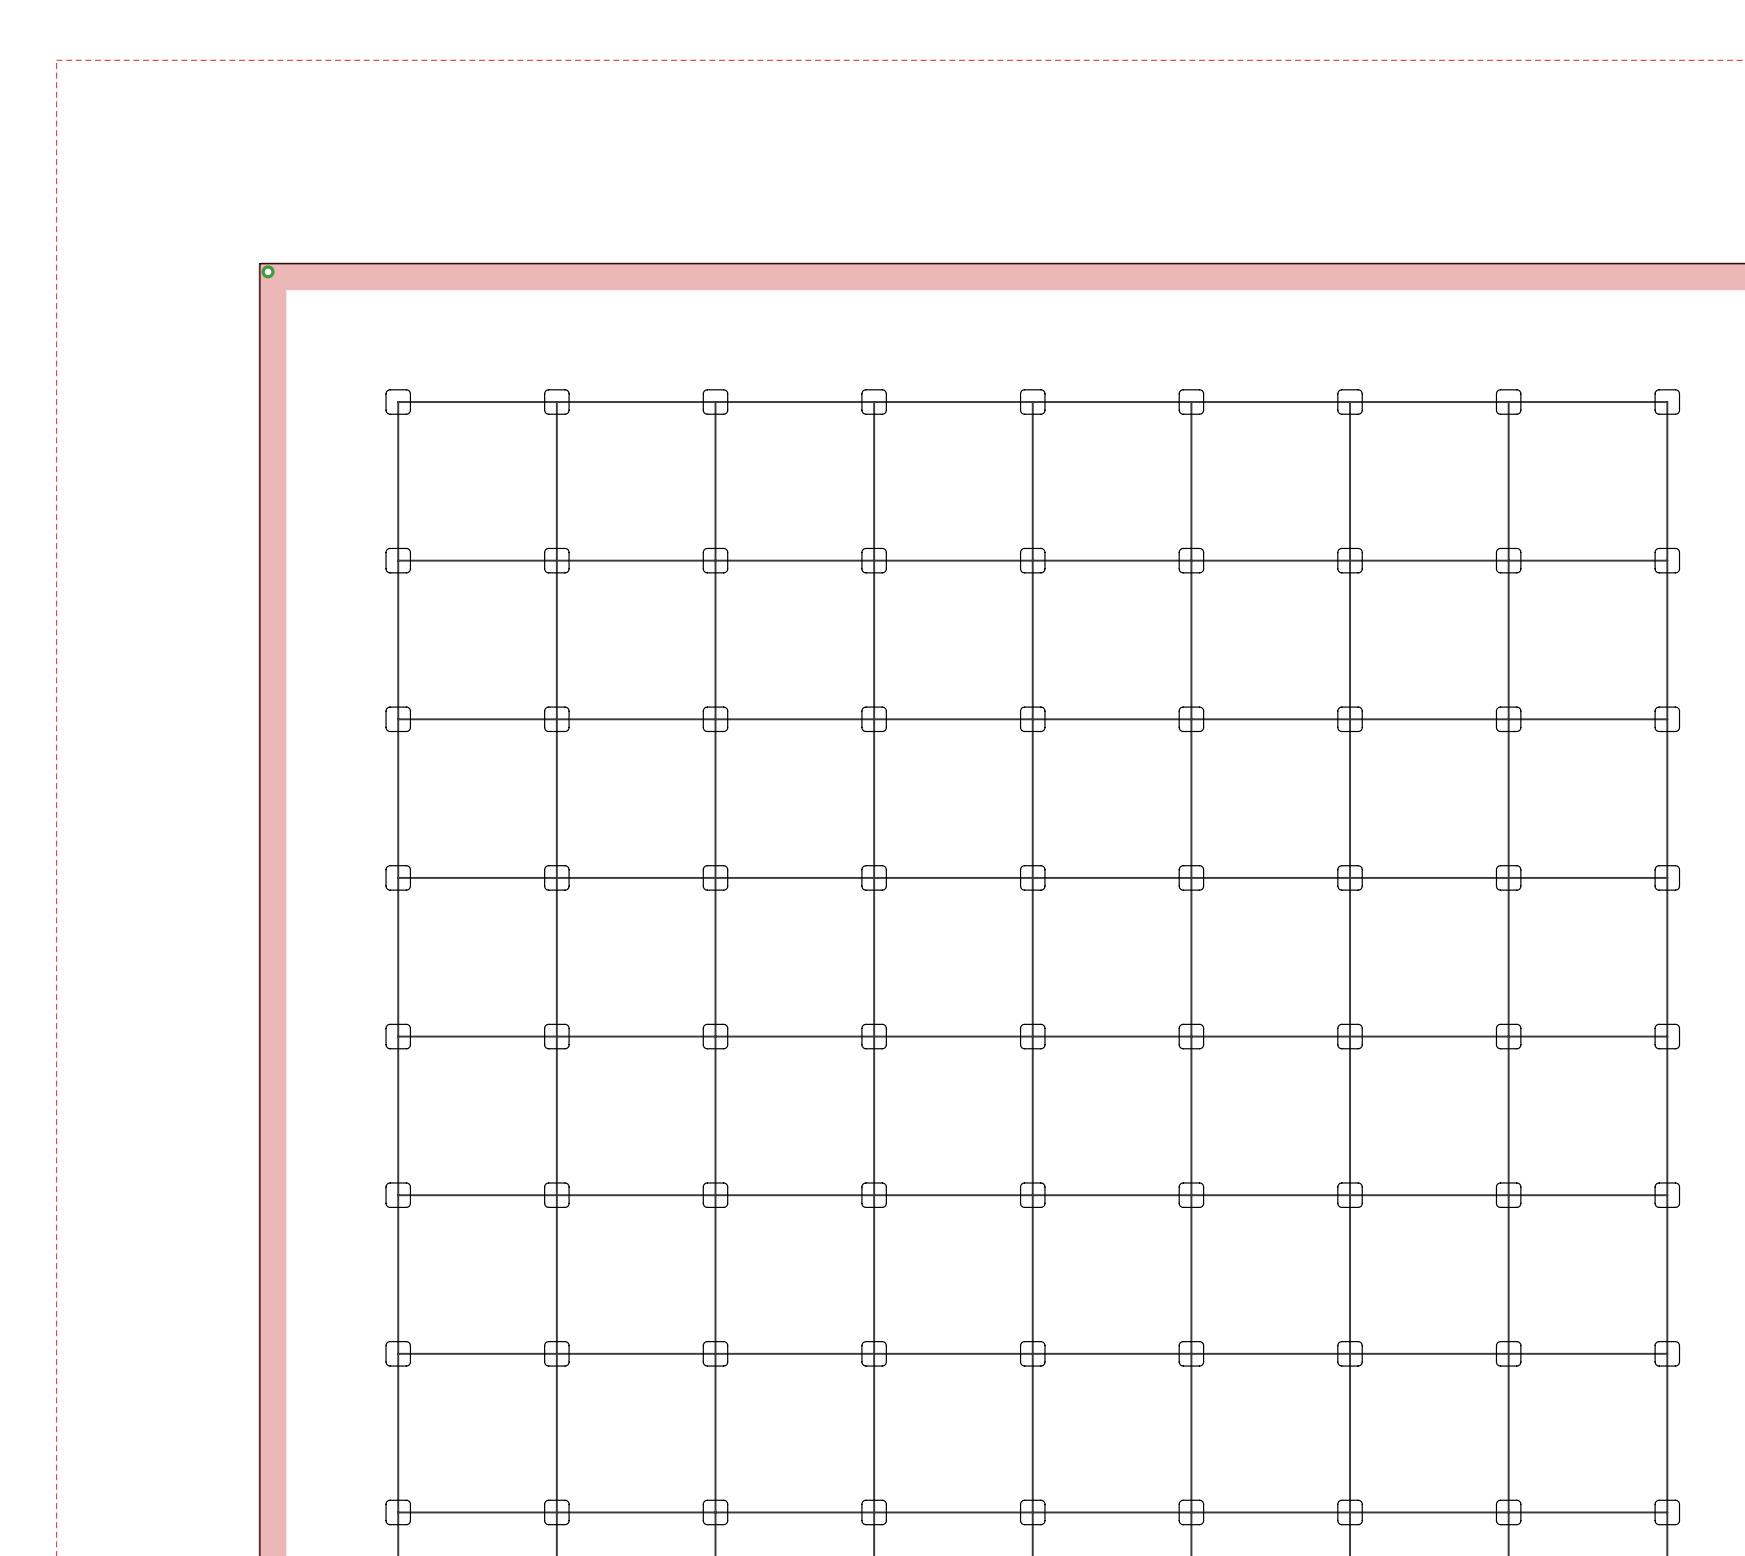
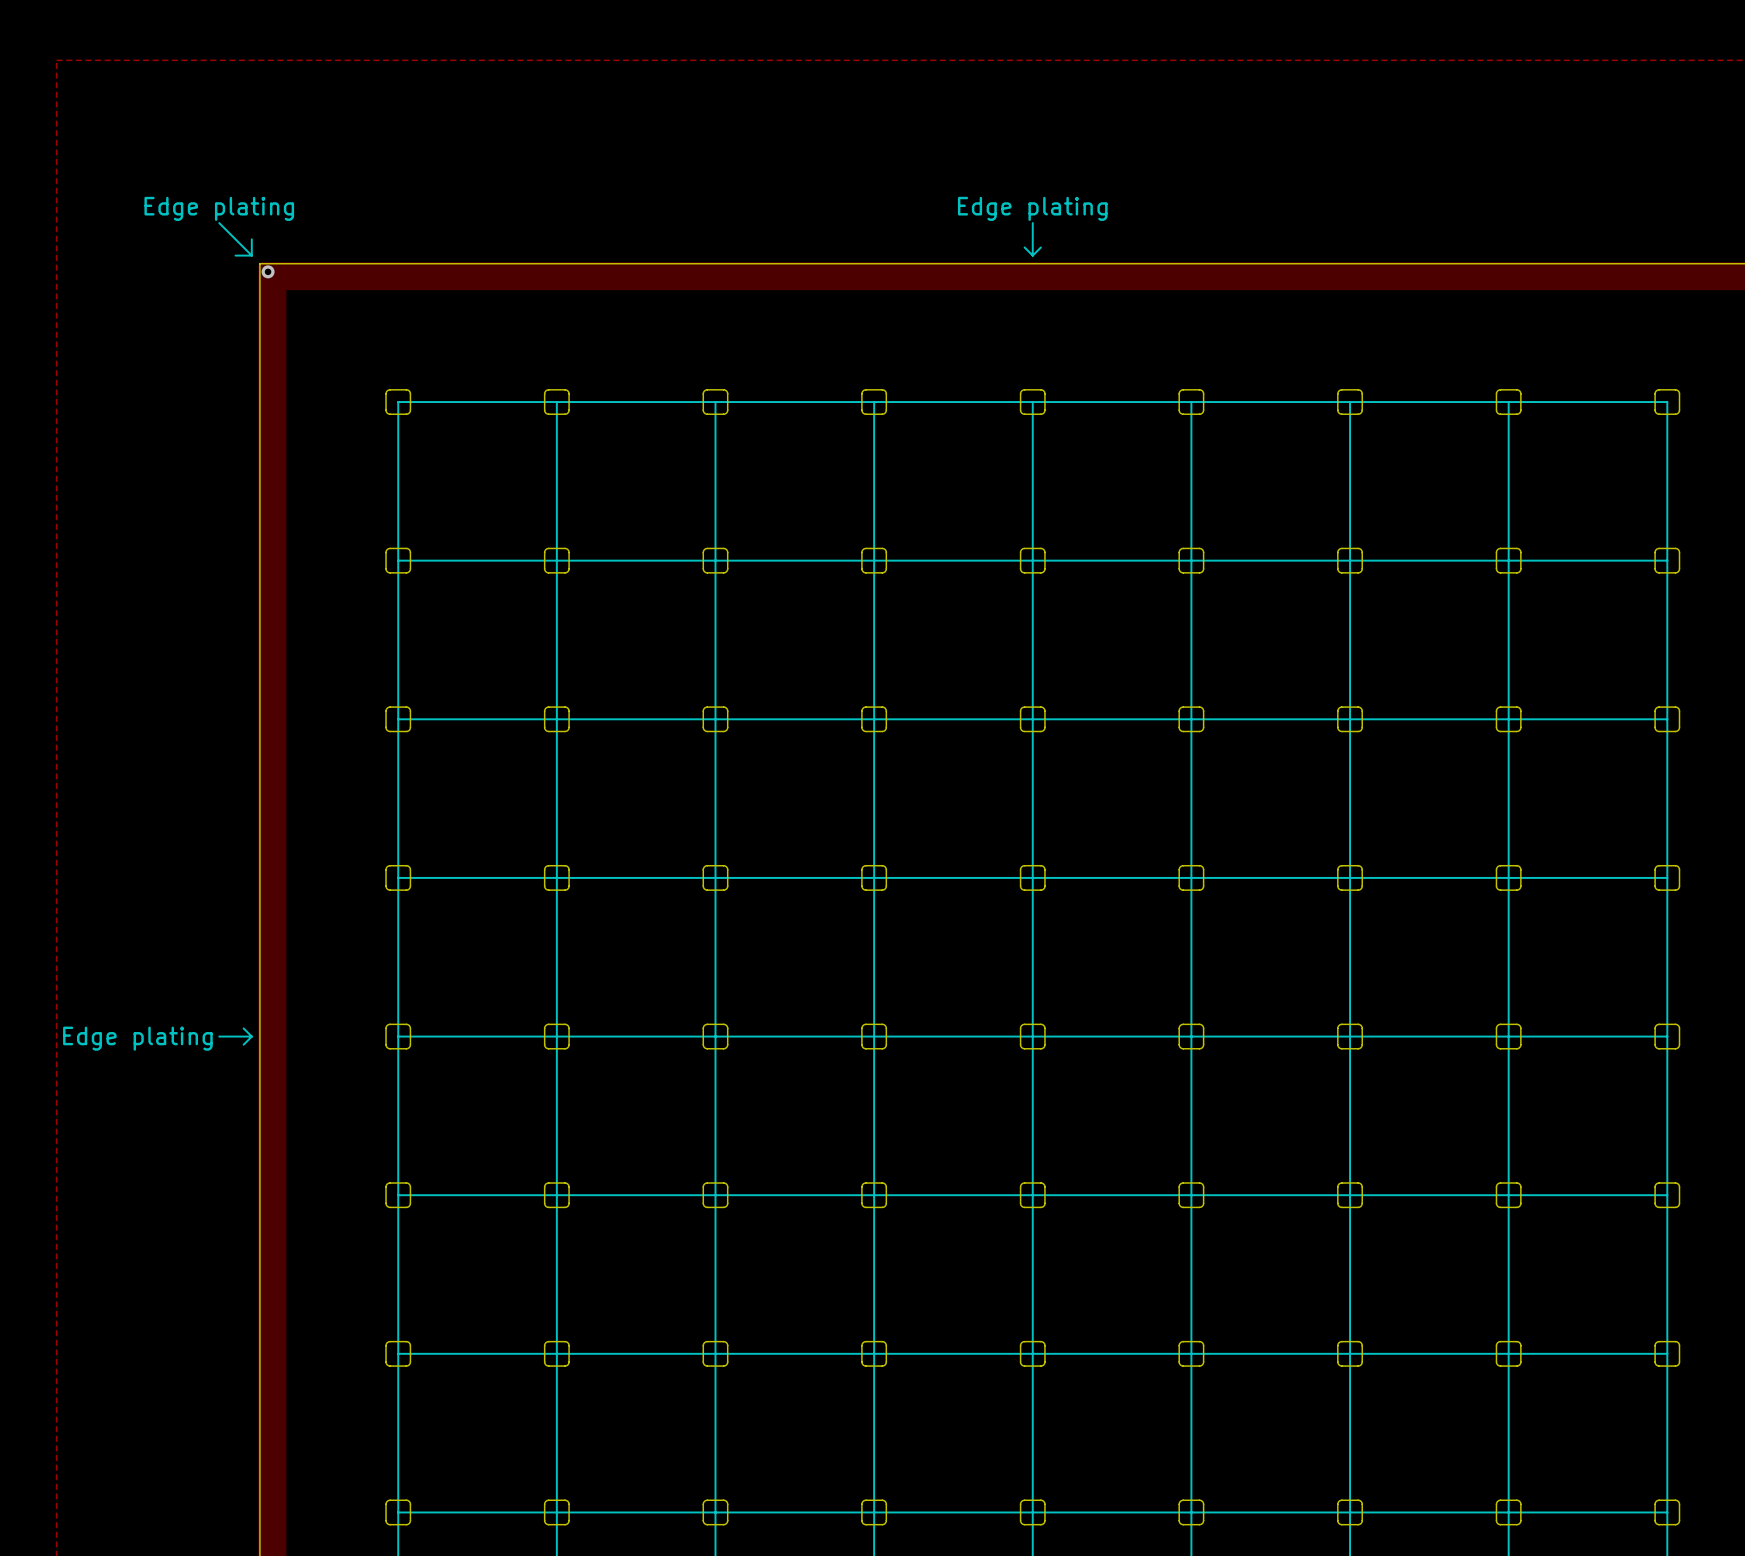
text: none -> Edge plating (219, 208)
text: none -> Edge plating (1032, 208)
line: none -> (219, 223) (251, 255)
line: none -> (1032, 223) (1032, 255)
line: none -> (251, 239) (251, 255)
line: none -> (1024, 247) (1032, 255)
line: none -> (1040, 247) (1032, 255)
line: none -> (235, 255) (251, 255)
line: none -> (243, 1028) (251, 1036)
line: none -> (219, 1036) (251, 1036)
line: none -> (251, 1036) (243, 1044)
text: none -> Edge plating (137, 1038)

